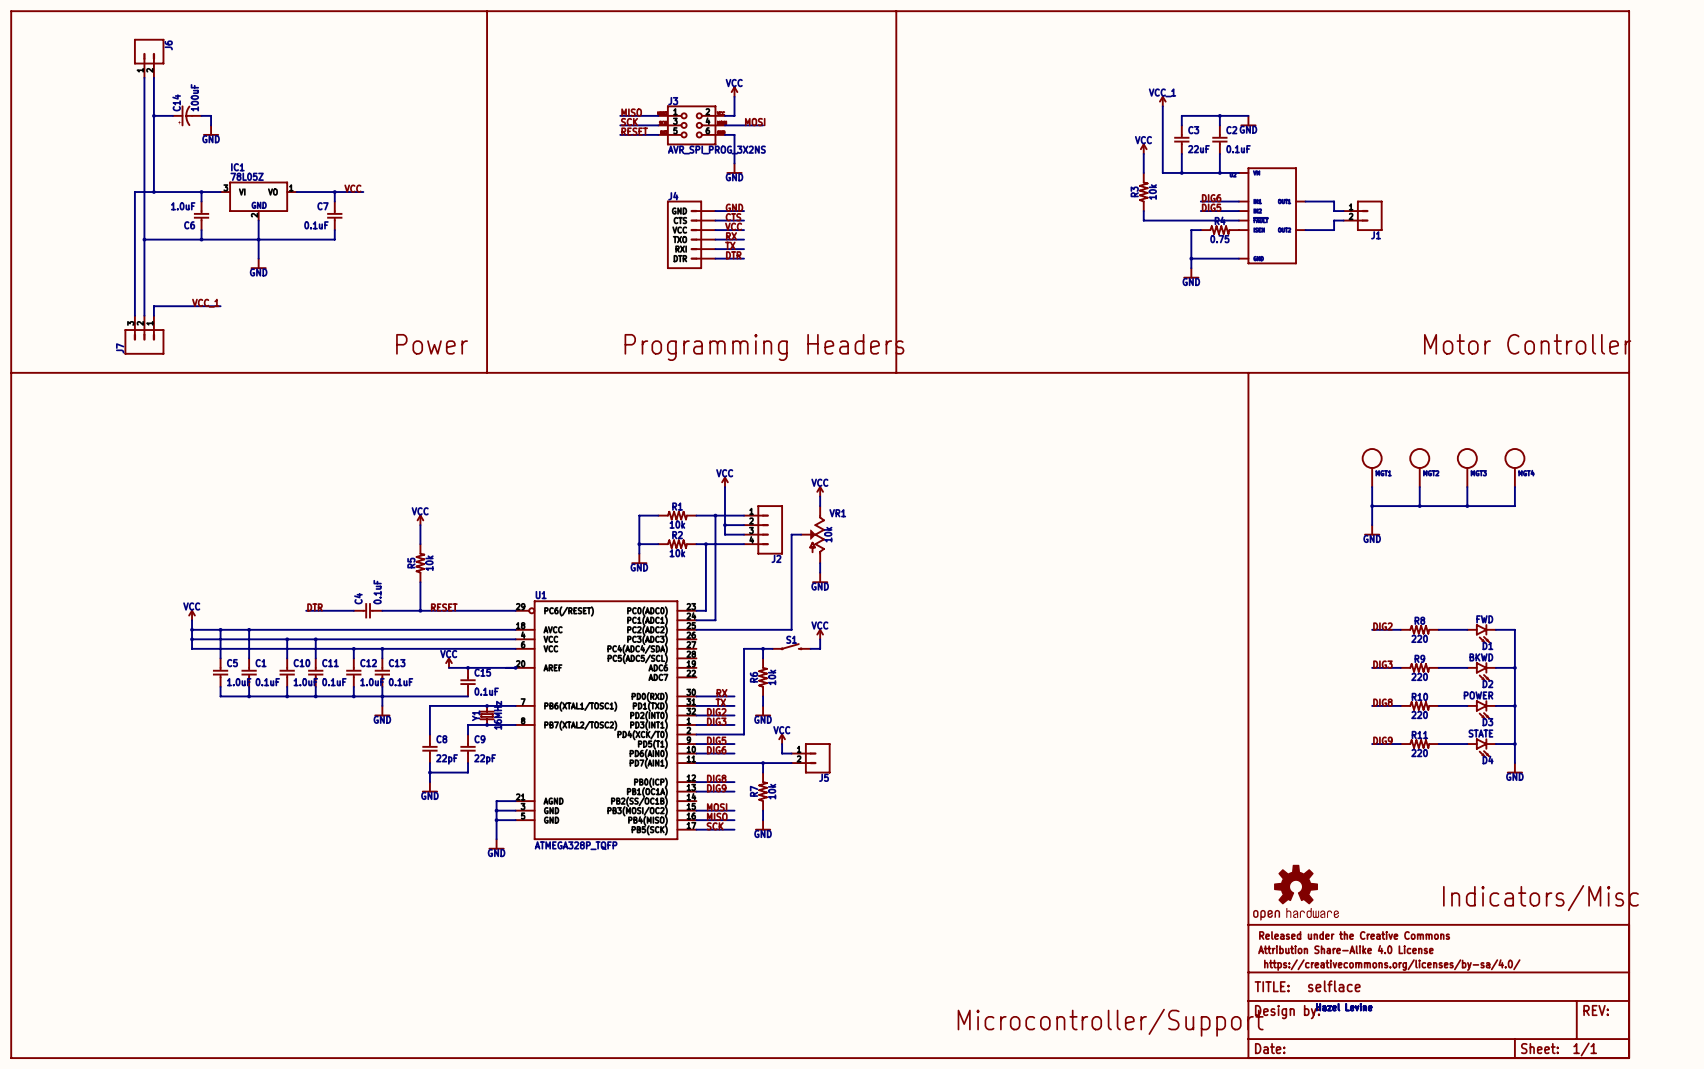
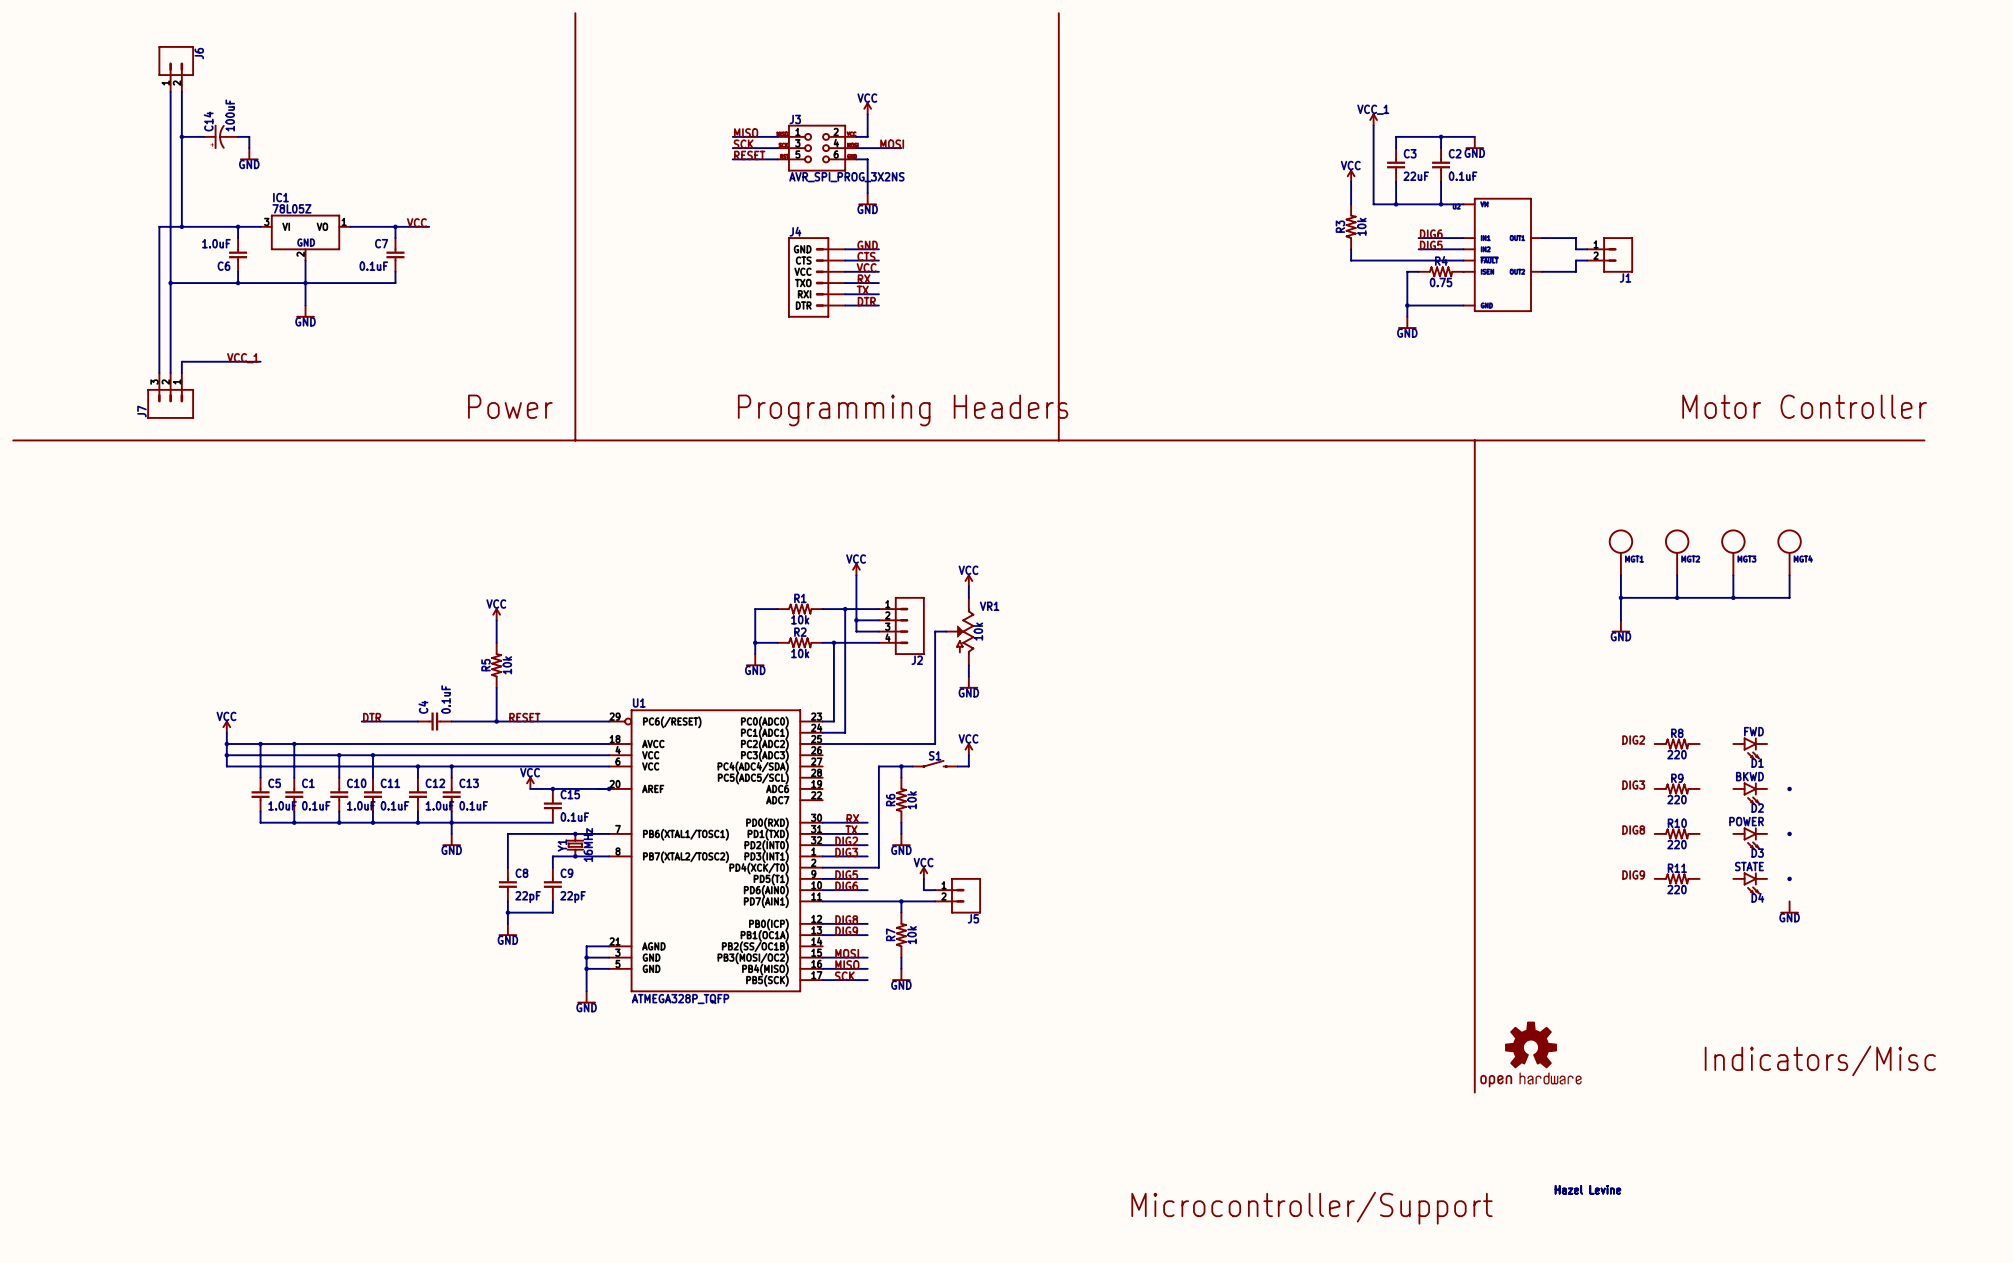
part: (820, 534) -> none
wire: (1372, 629) (1400, 629) -> none
wire: (1438, 629) (1467, 629) -> none
wire: (1495, 629) (1514, 629) (1514, 763) -> none
wire: (1372, 667) (1400, 667) -> none
wire: (1438, 667) (1467, 667) -> none
wire: (1495, 667) (1514, 667) -> none
wire: (1372, 705) (1400, 705) -> none
wire: (1438, 705) (1467, 705) -> none
wire: (1495, 705) (1514, 705) -> none
wire: (1372, 744) (1400, 744) -> none
wire: (1438, 744) (1467, 744) -> none
wire: (1495, 744) (1514, 744) -> none
part: (1438, 991) -> none

